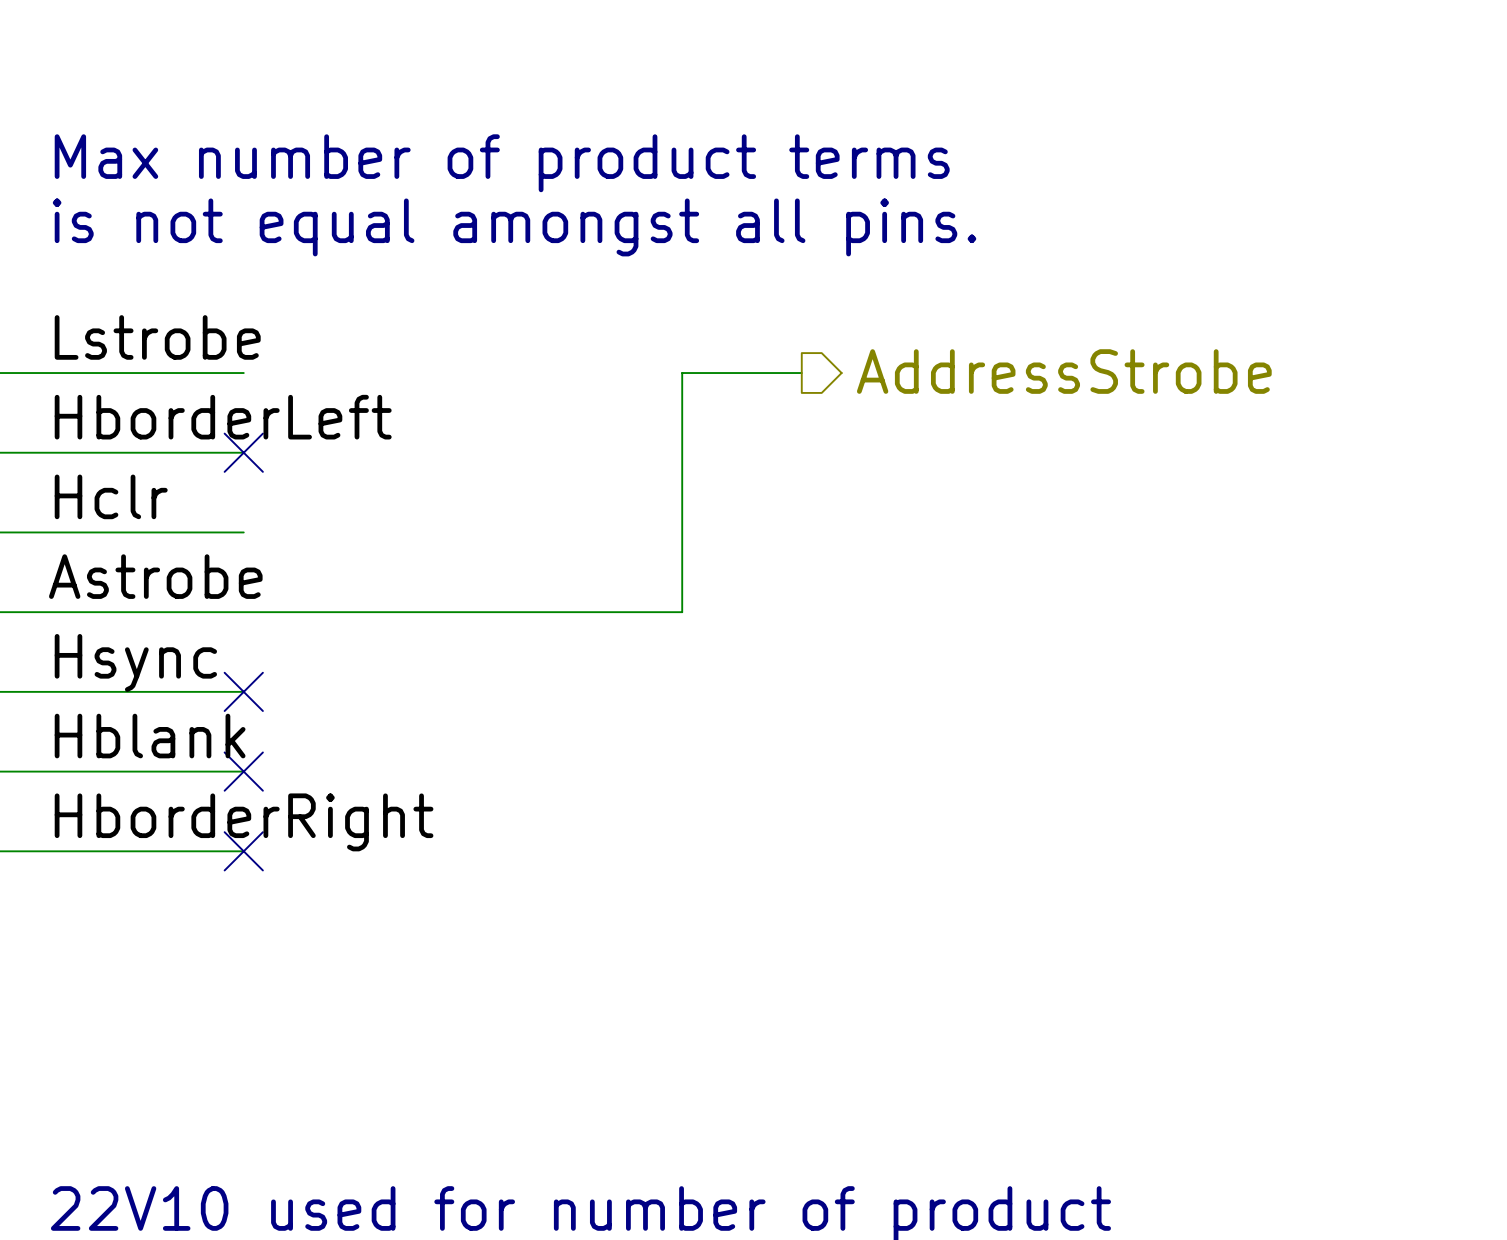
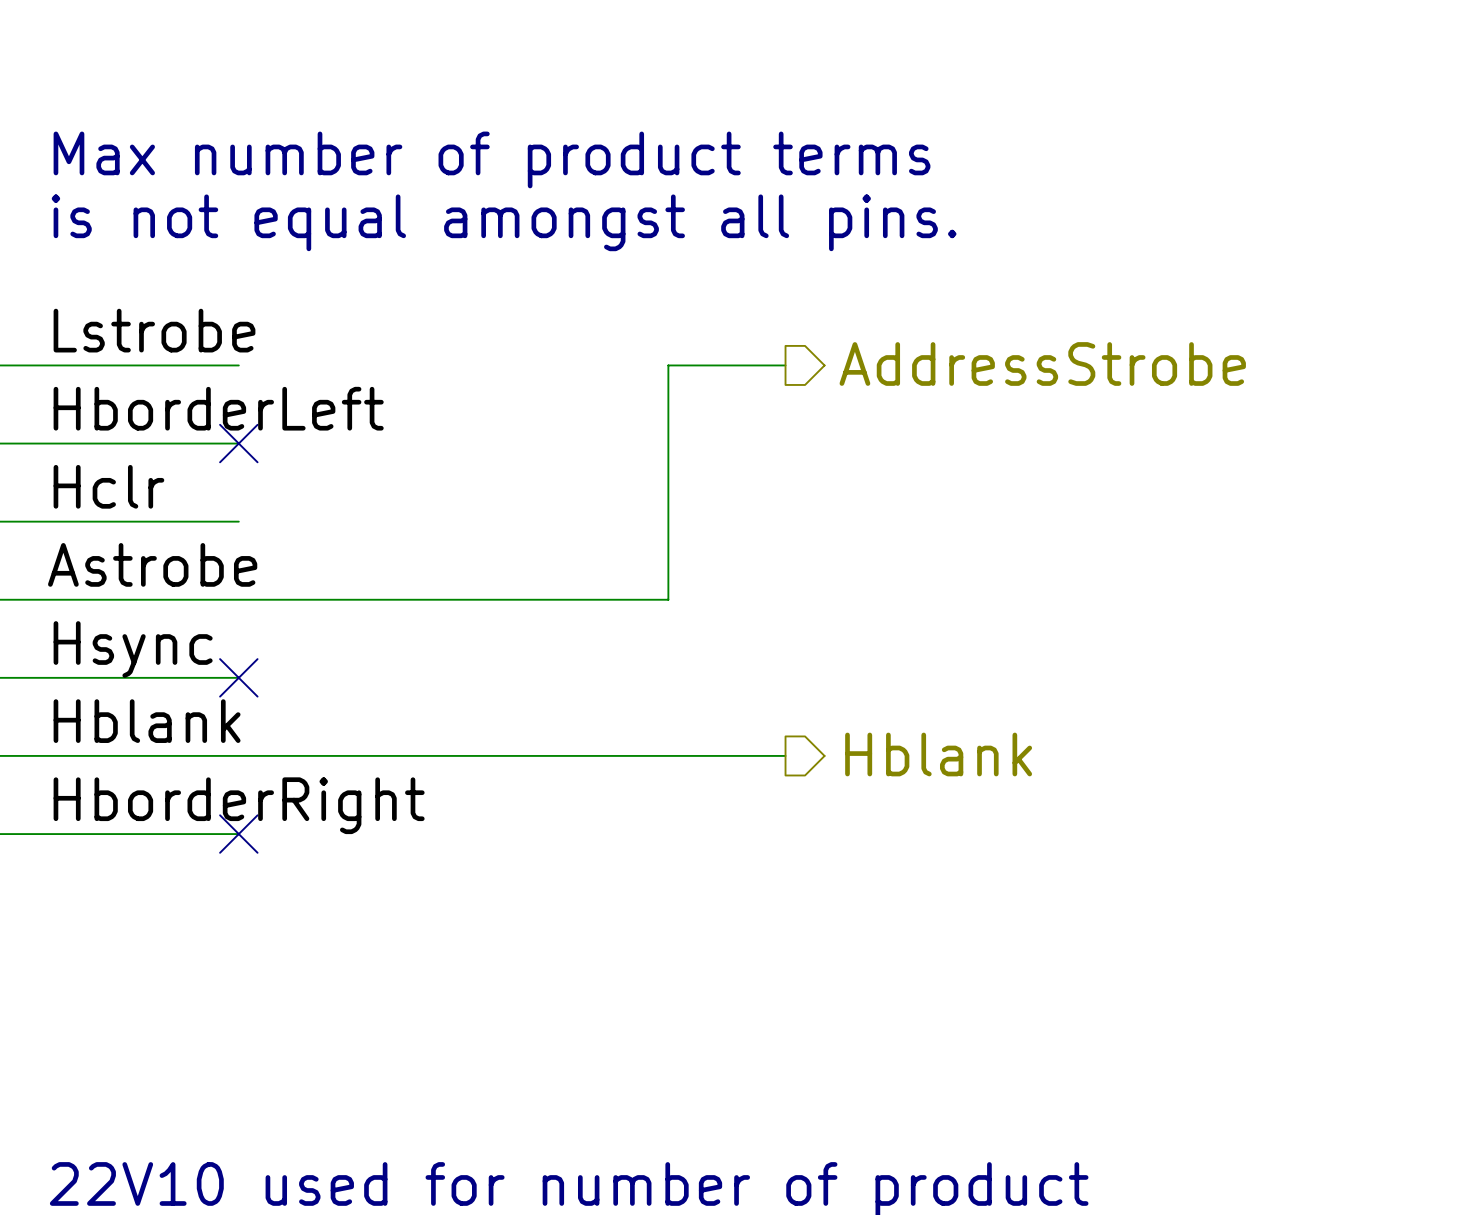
hierarchical label: none -> Hblank (938, 754)
wire: none -> (238, 755) (785, 755)
no-connect mark: (243, 771) -> none

